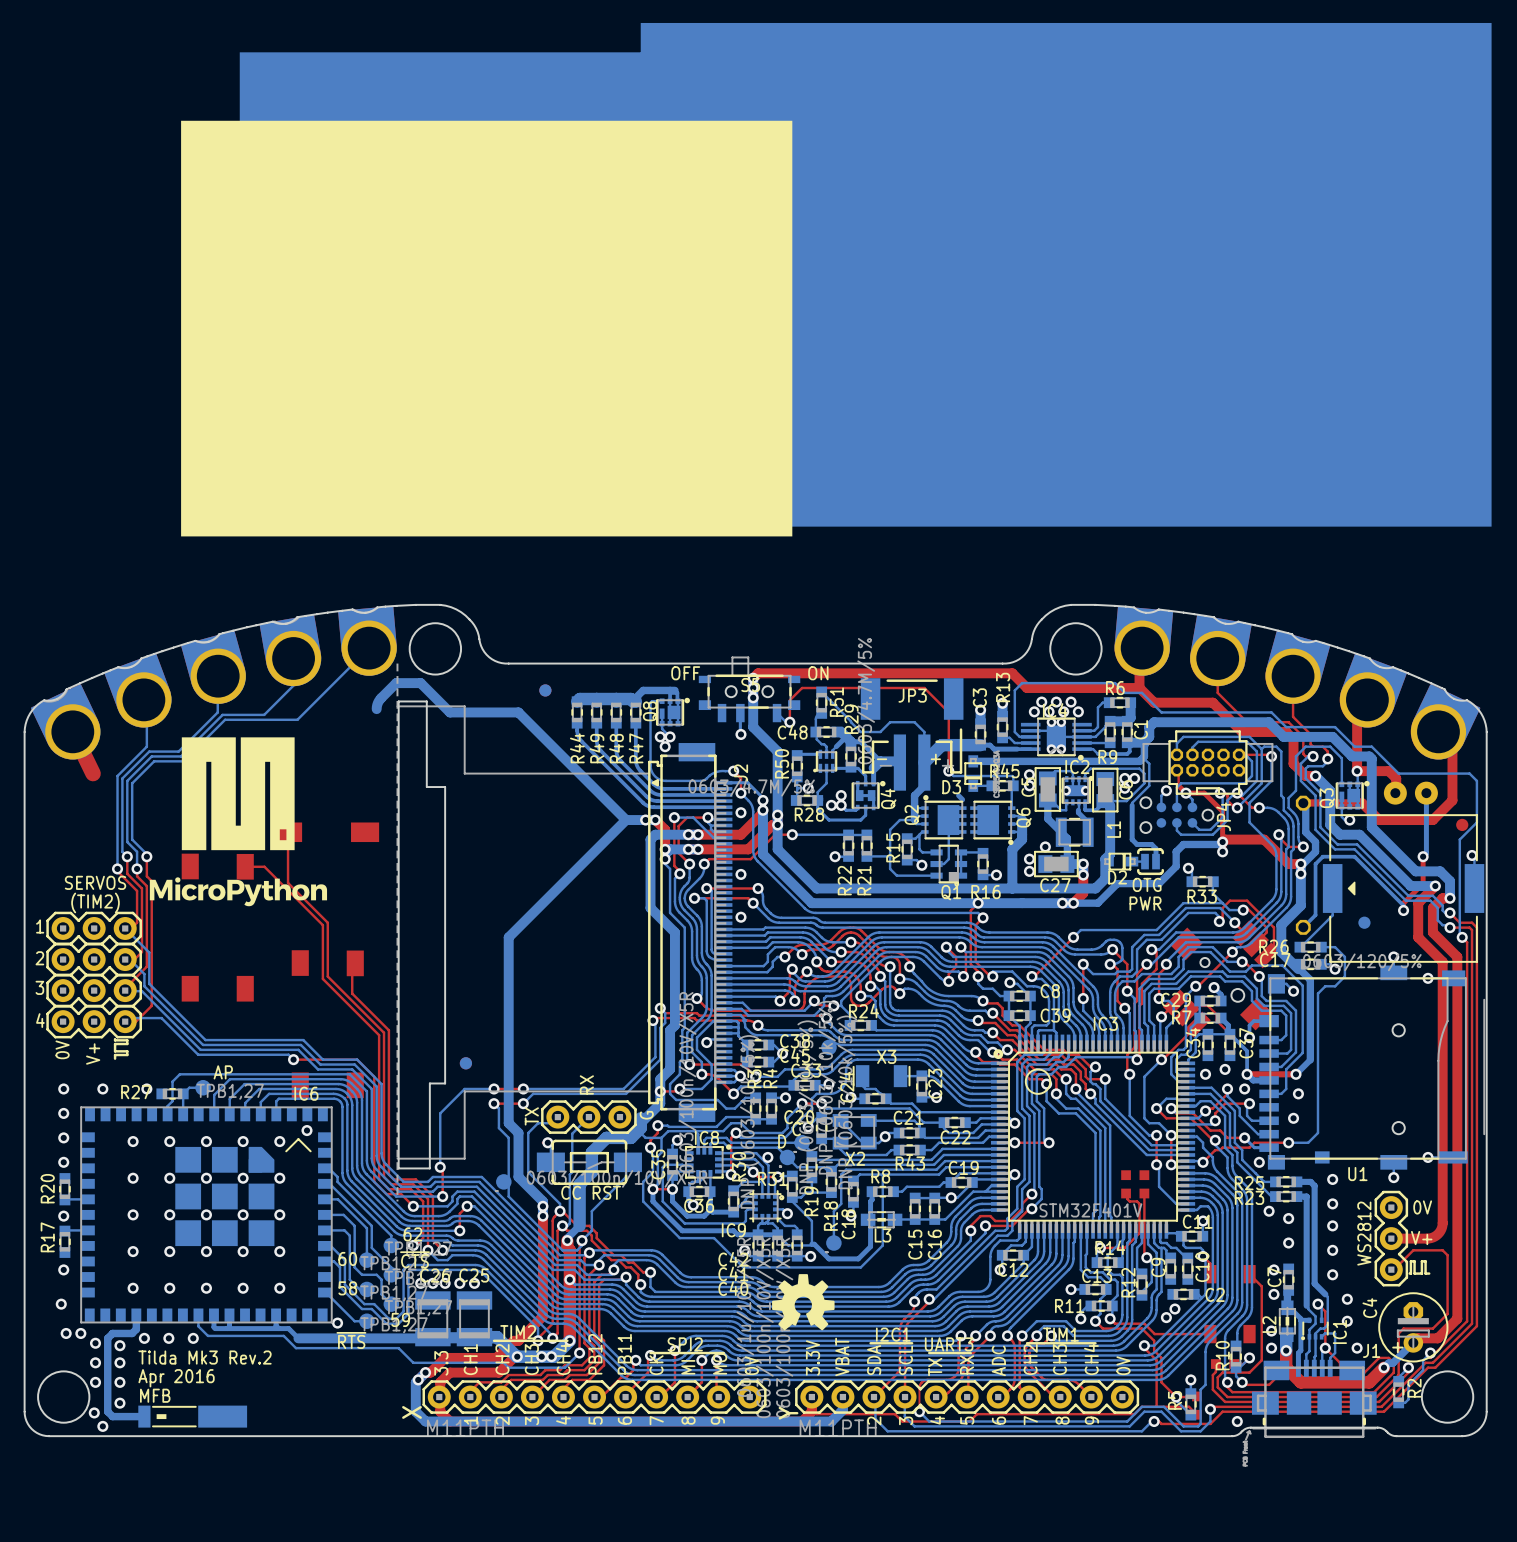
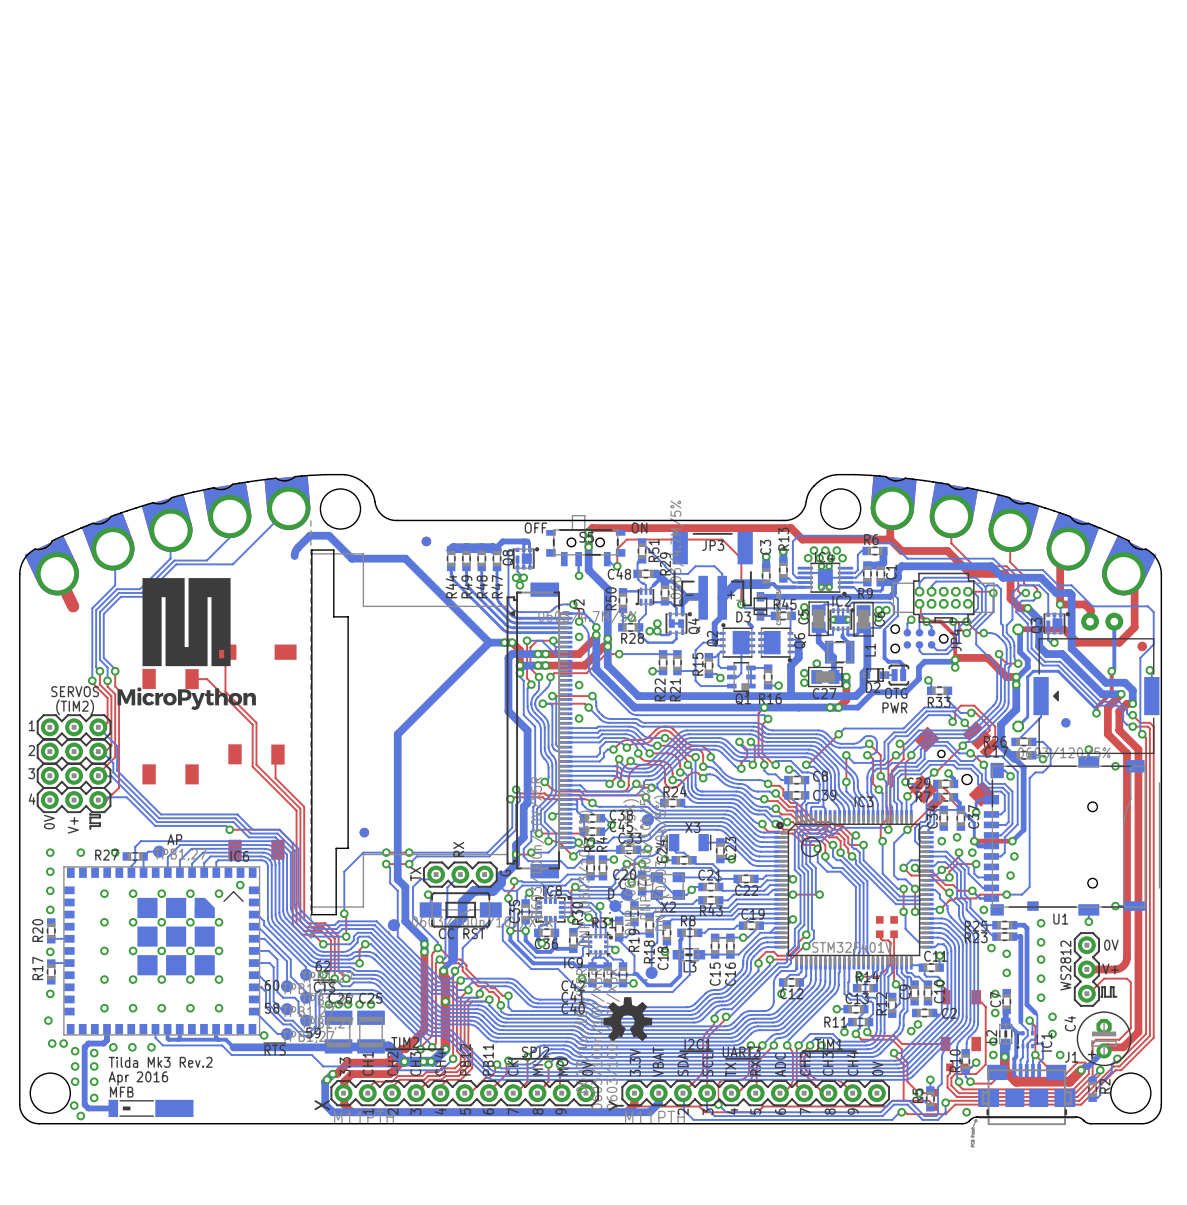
drawing: [181, 22, 1492, 537] -> none

